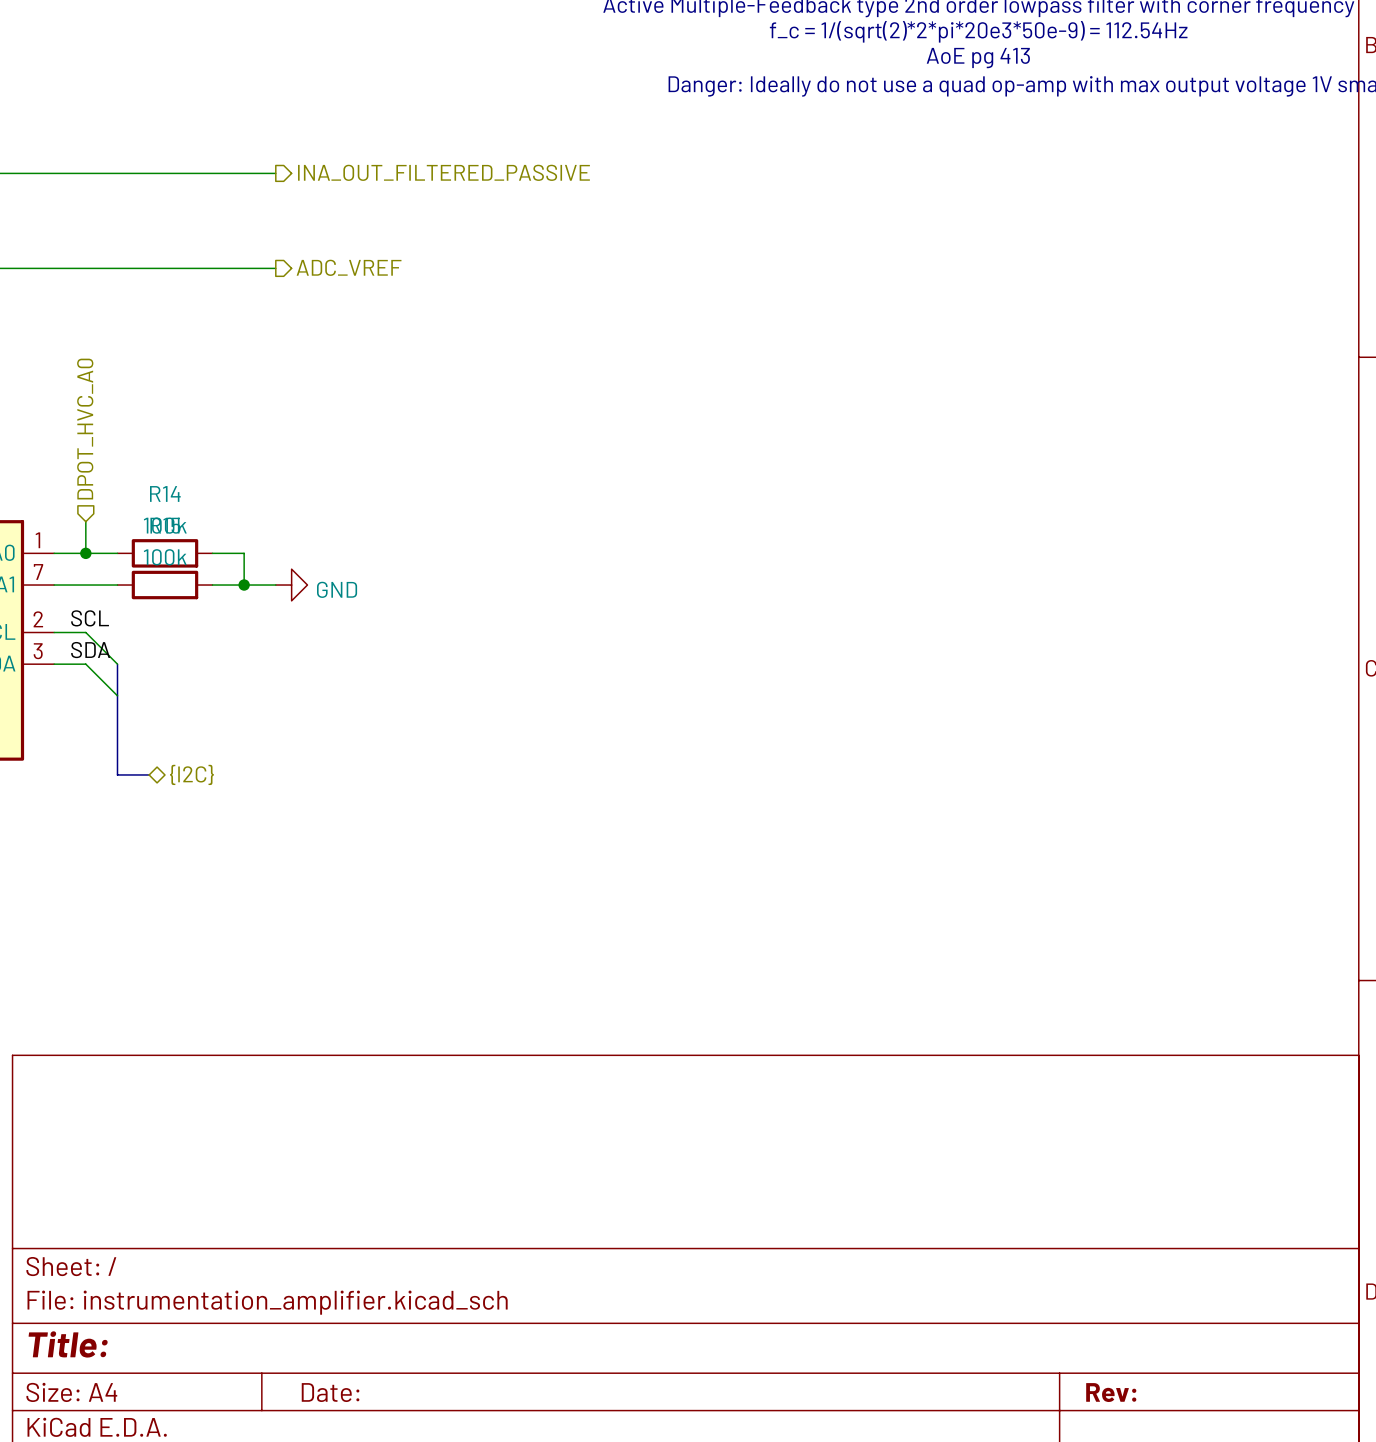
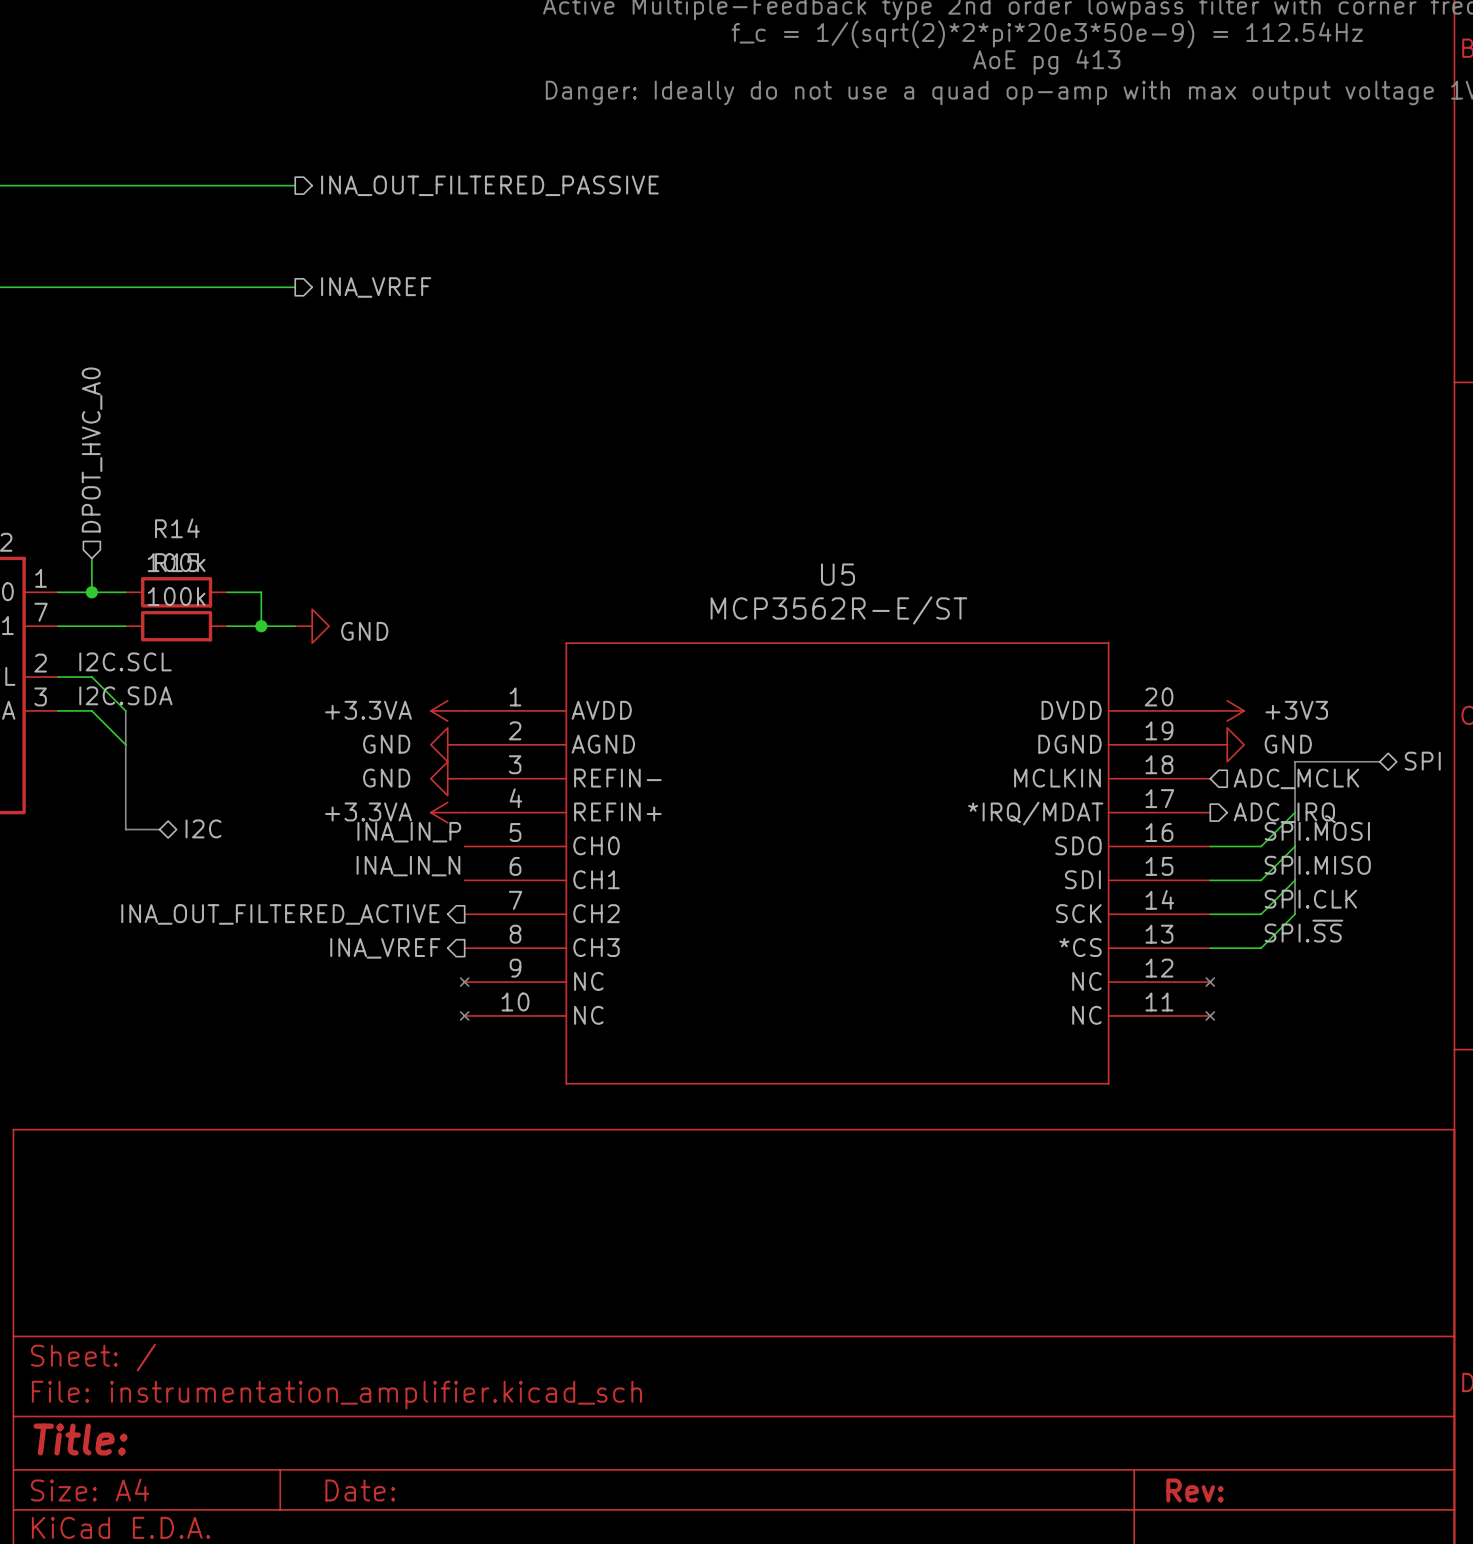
hierarchical label: ADC_VREF (349, 267) -> INA_VREF (376, 287)
label: SCL (90, 618) -> I2C.SCL (125, 661)
label: SDA (90, 650) -> I2C.SDA (125, 695)
power symbol: none -> +3.3VA (447, 710)
power symbol: none -> +3V3 (1227, 710)
power symbol: none -> GND (447, 744)
power symbol: none -> GND (1227, 744)
bus: none -> (1379, 761) (1295, 761) (1295, 914)
hierarchical label: none -> SPI (1422, 761)
hierarchical label: none -> ADC_MCLK (1296, 778)
power symbol: none -> GND (447, 778)
power symbol: none -> +3.3VA (447, 812)
hierarchical label: none -> ADC_IRQ (1284, 812)
wire: none -> (1295, 812) (1261, 846) (1210, 846)
hierarchical label: {I2C} (191, 774) -> I2C (203, 828)
label: none -> INA_IN_P (409, 832)
label: none -> SPI.MOSI (1317, 831)
wire: none -> (1295, 846) (1261, 880) (1210, 880)
U5: none -> MCP3562R-E/ST (837, 863)
label: none -> INA_IN_N (408, 866)
label: none -> SPI.MISO (1317, 865)
wire: none -> (1295, 880) (1261, 914) (1210, 914)
label: none -> SPI.CLK (1310, 899)
hierarchical label: none -> INA_OUT_FILTERED_ACTIVE (280, 914)
wire: none -> (1295, 914) (1261, 948) (1210, 948)
label: none -> SPI.~{SS} (1303, 931)
hierarchical label: none -> INA_VREF (385, 948)

